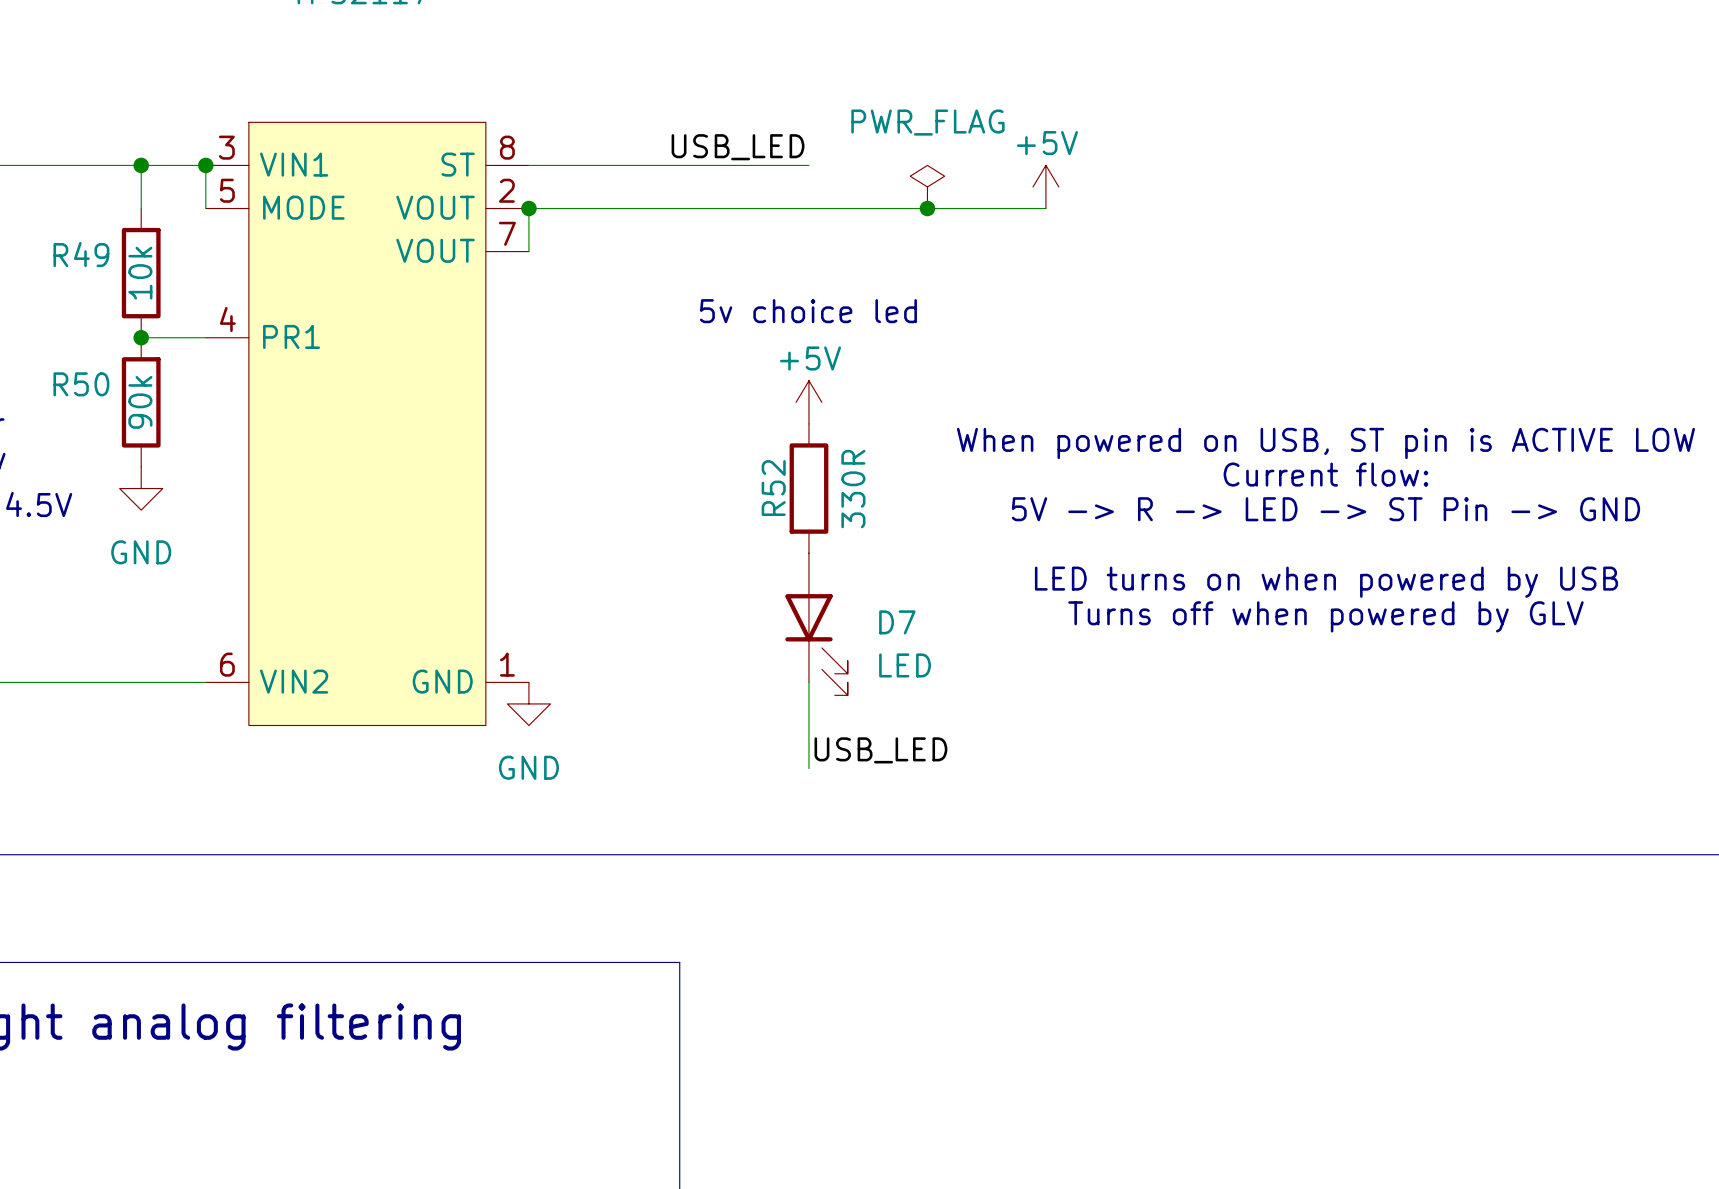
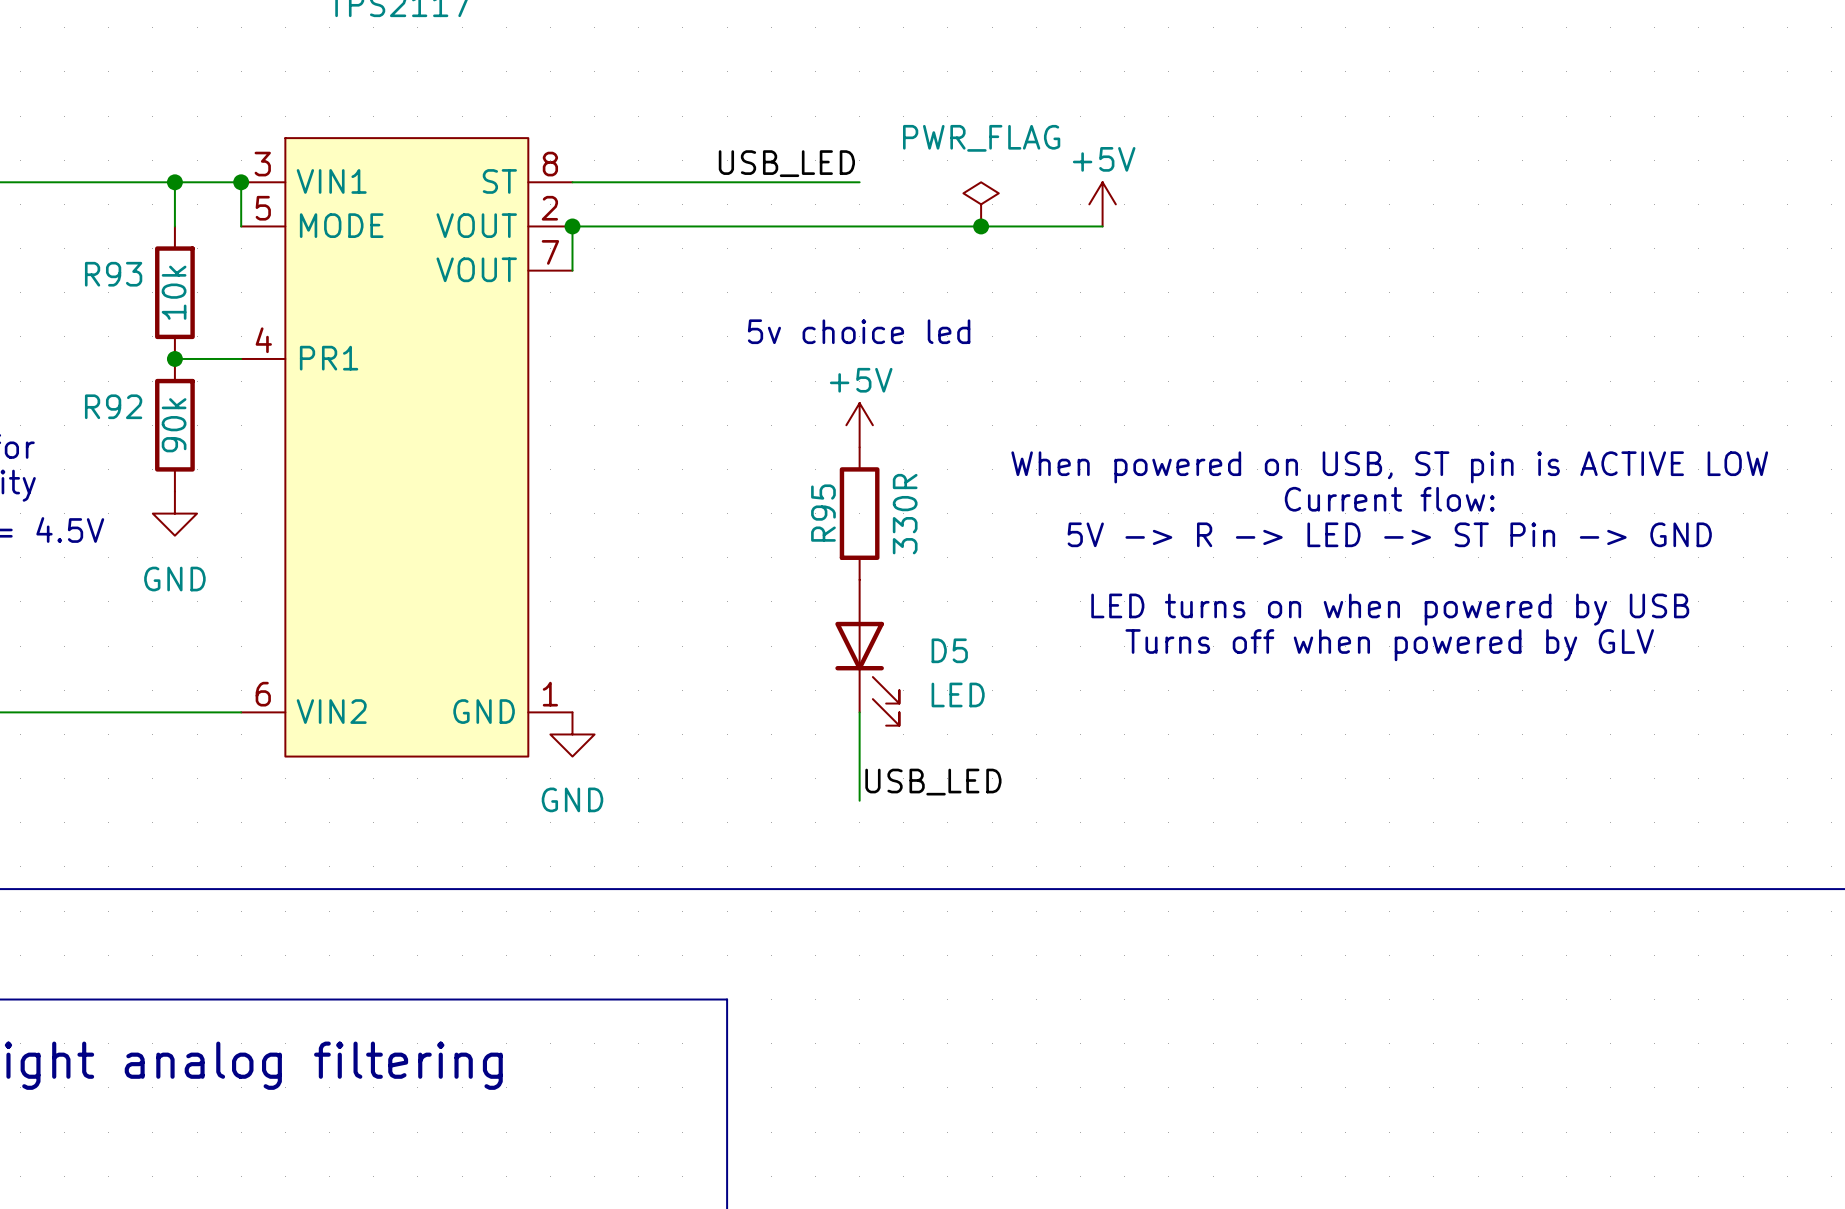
R49 name: R49 (81, 254) -> R93 (113, 274)
R50 name: R50 (81, 384) -> R92 (113, 406)
R52 name: R52 (773, 488) -> R95 (823, 513)
D7 name: D7 (897, 622) -> D5 (949, 650)

